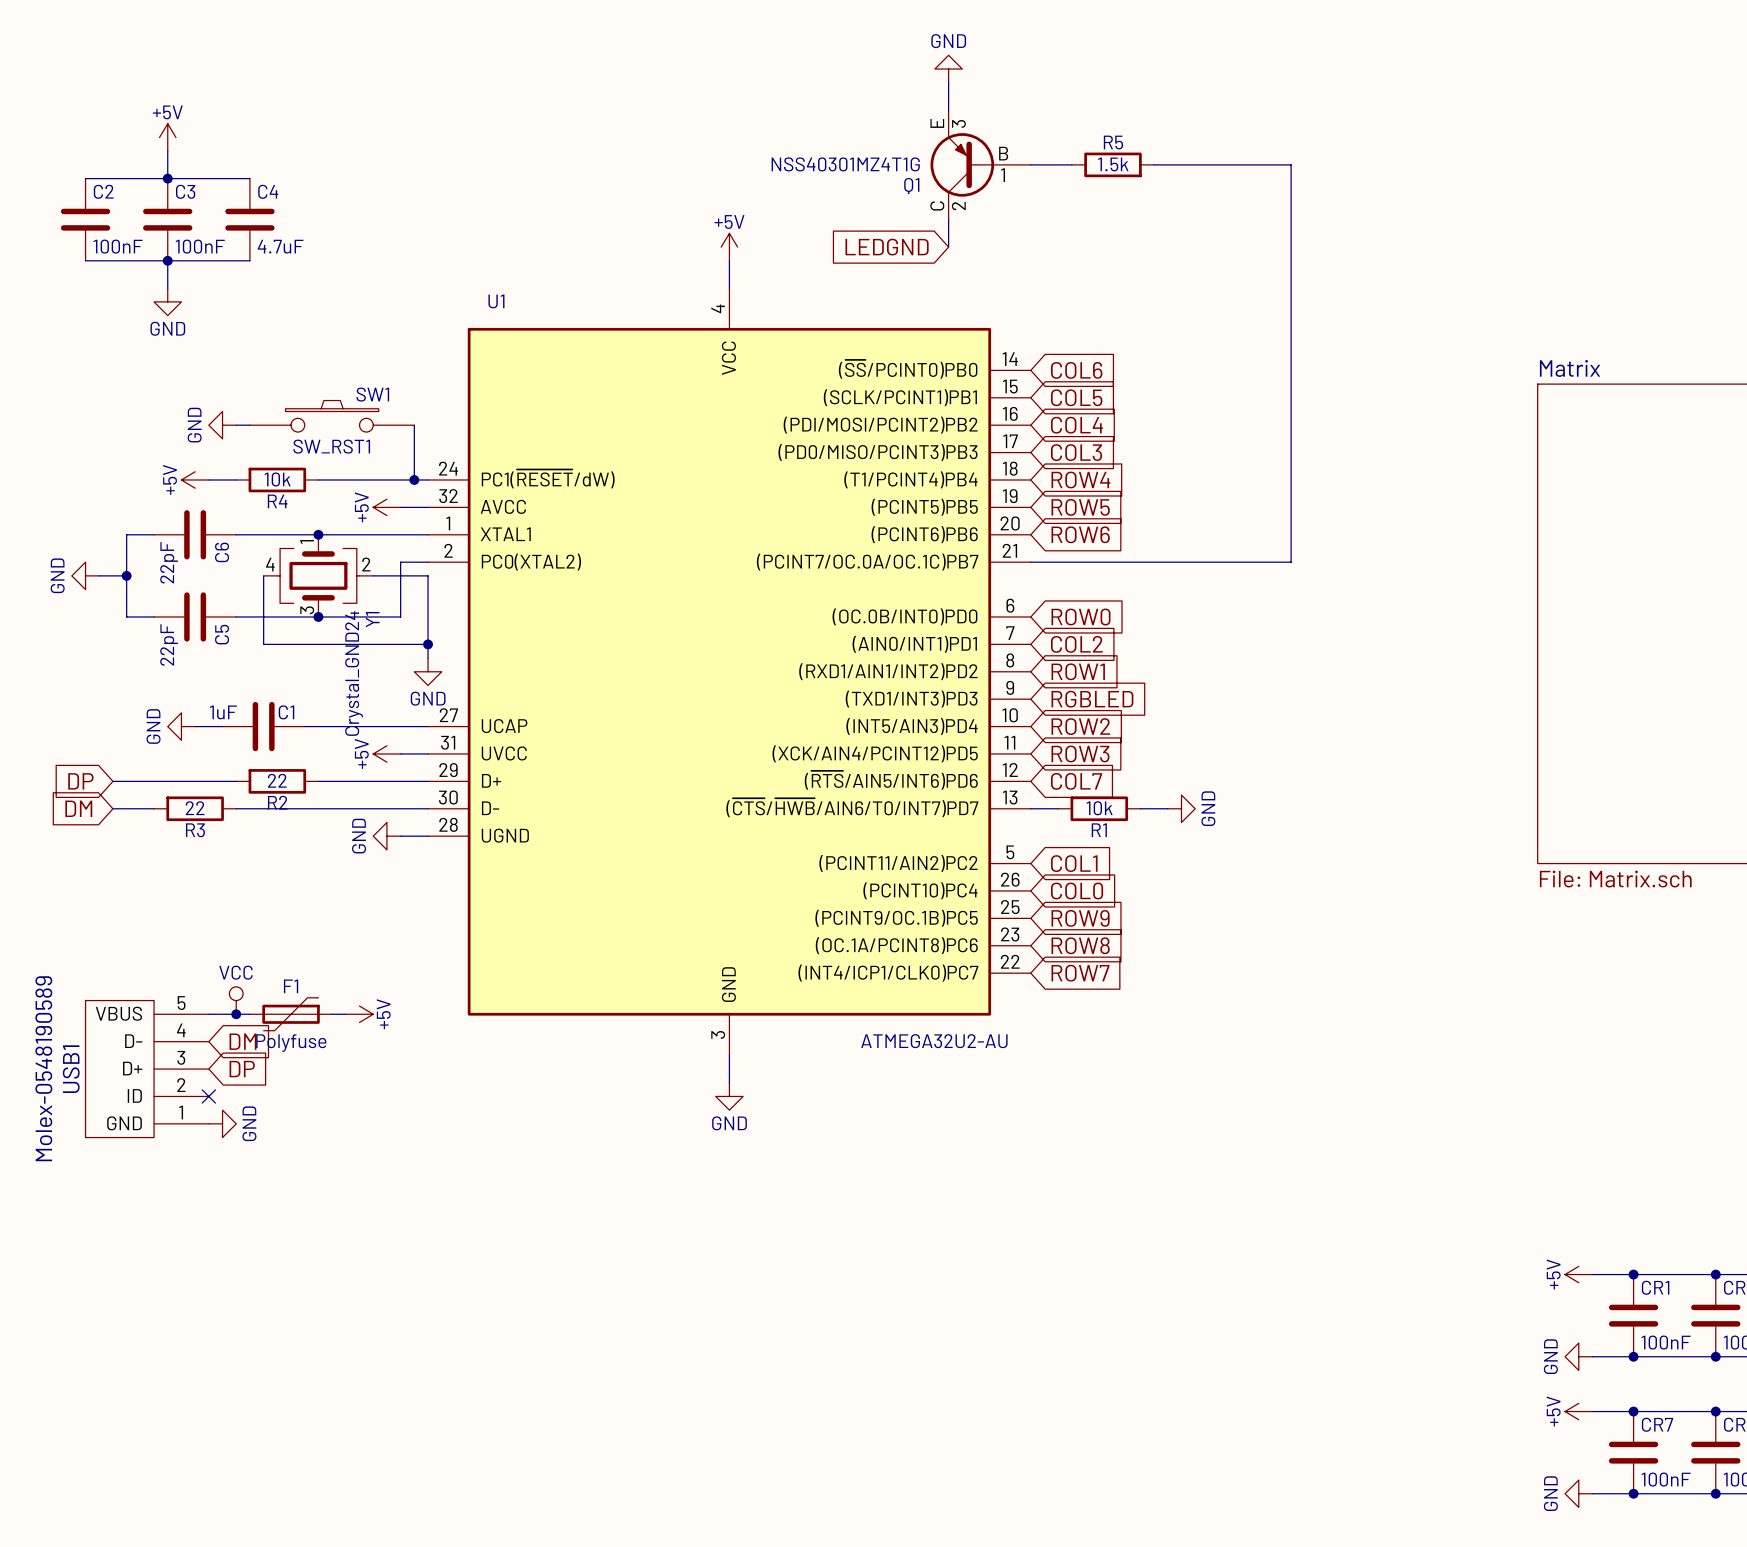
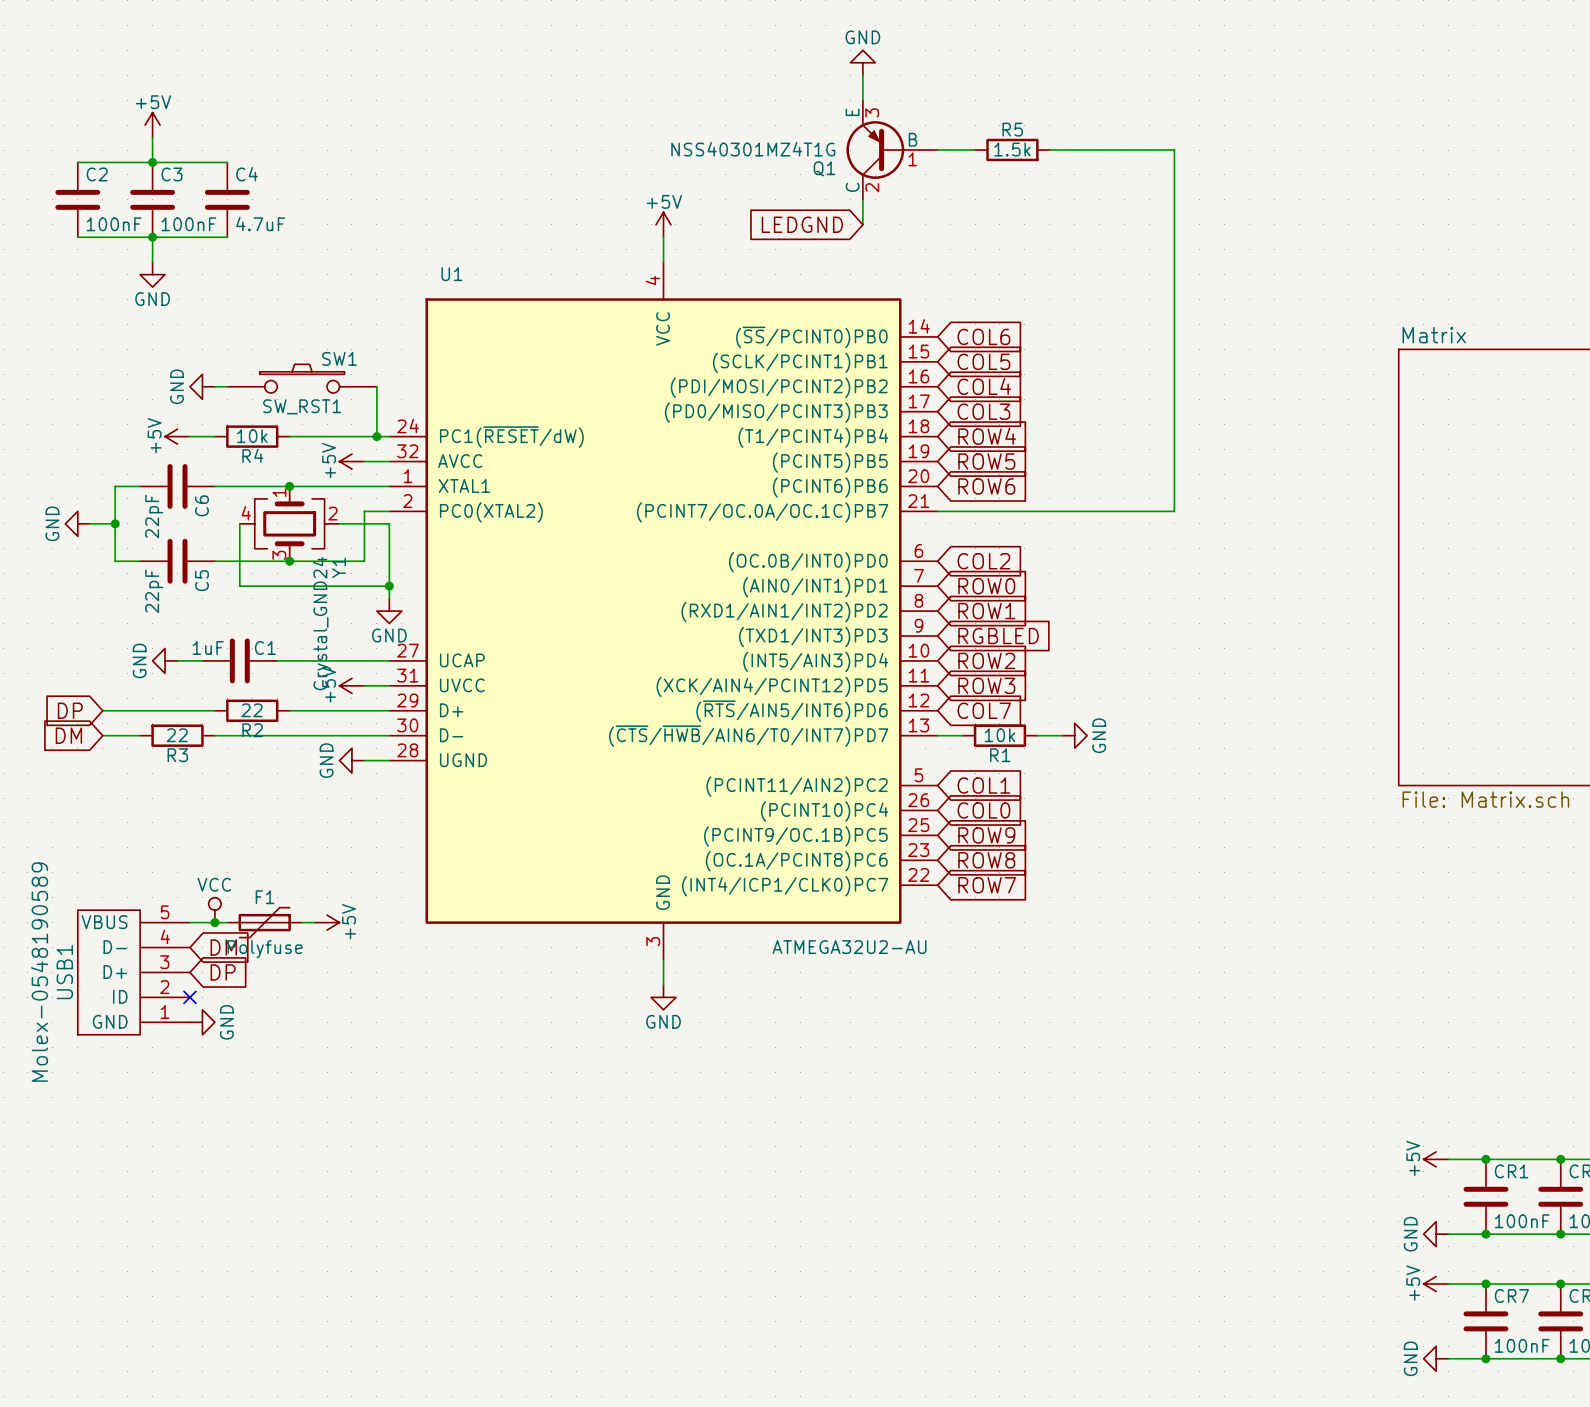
global label: ROW0 (1081, 617) -> COL2 (983, 561)
global label: COL2 (1076, 644) -> ROW0 (986, 586)

